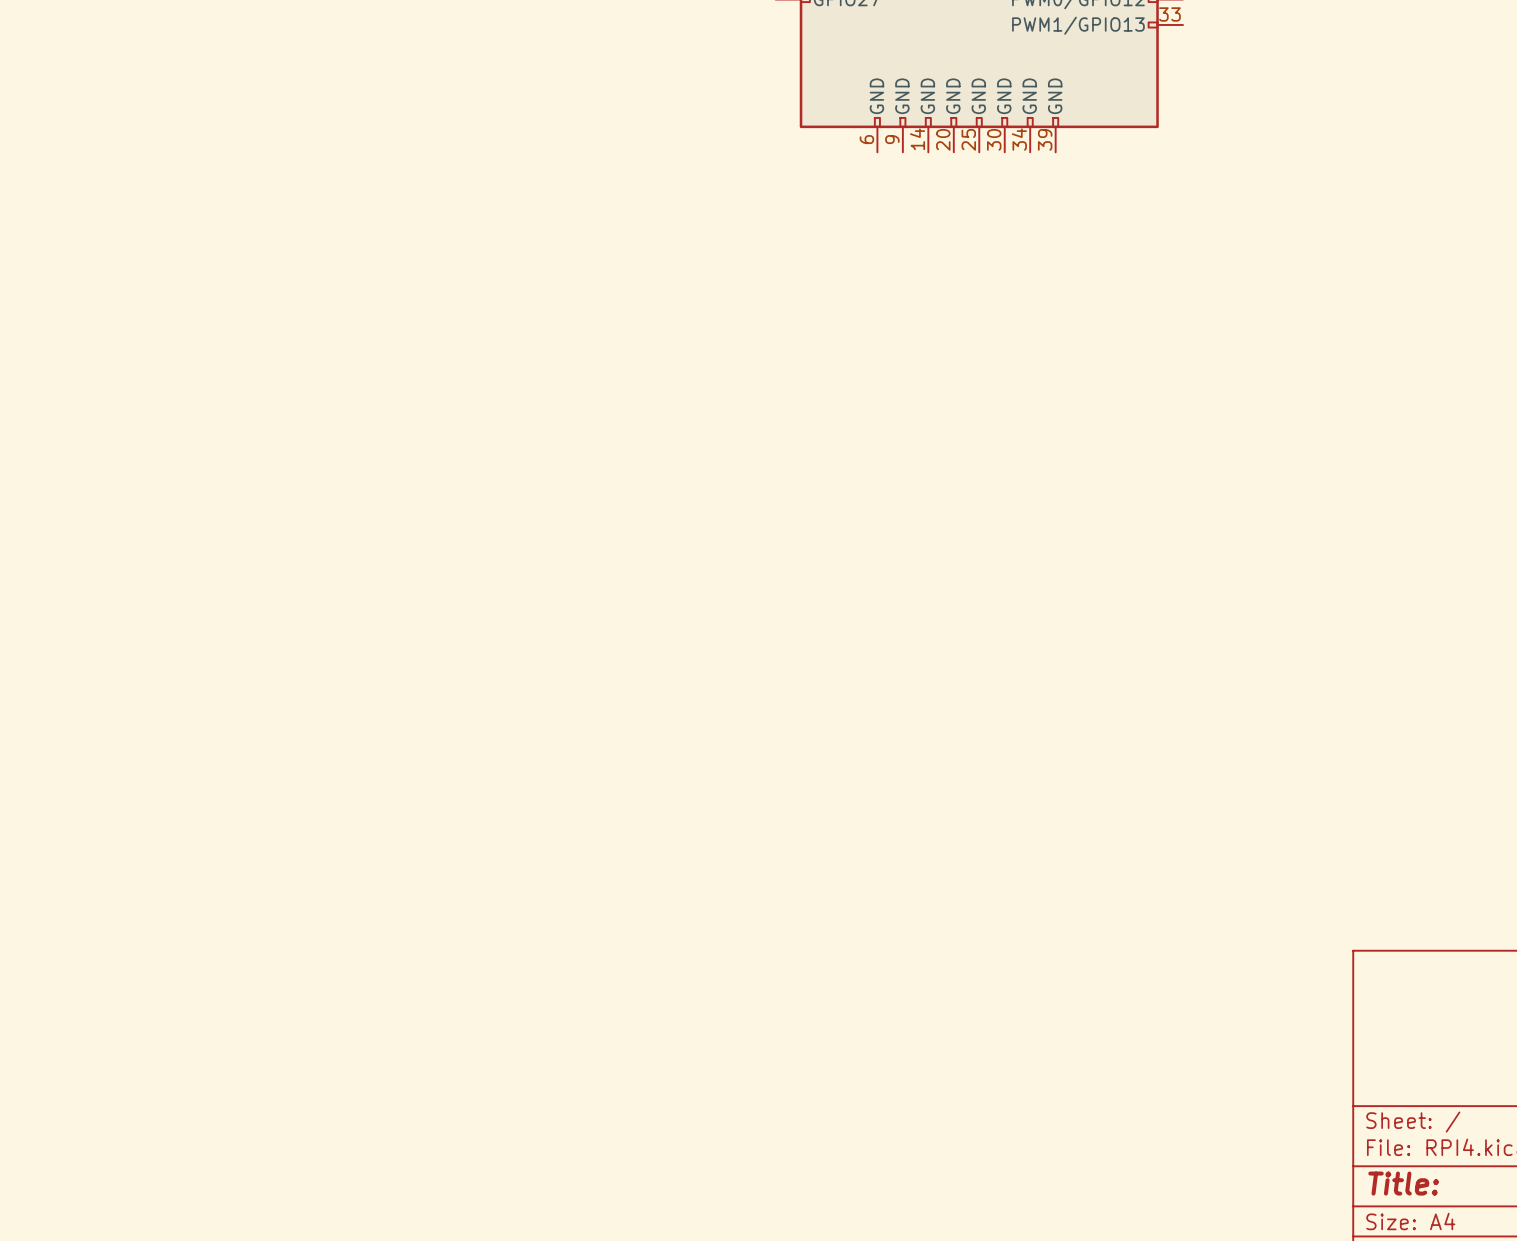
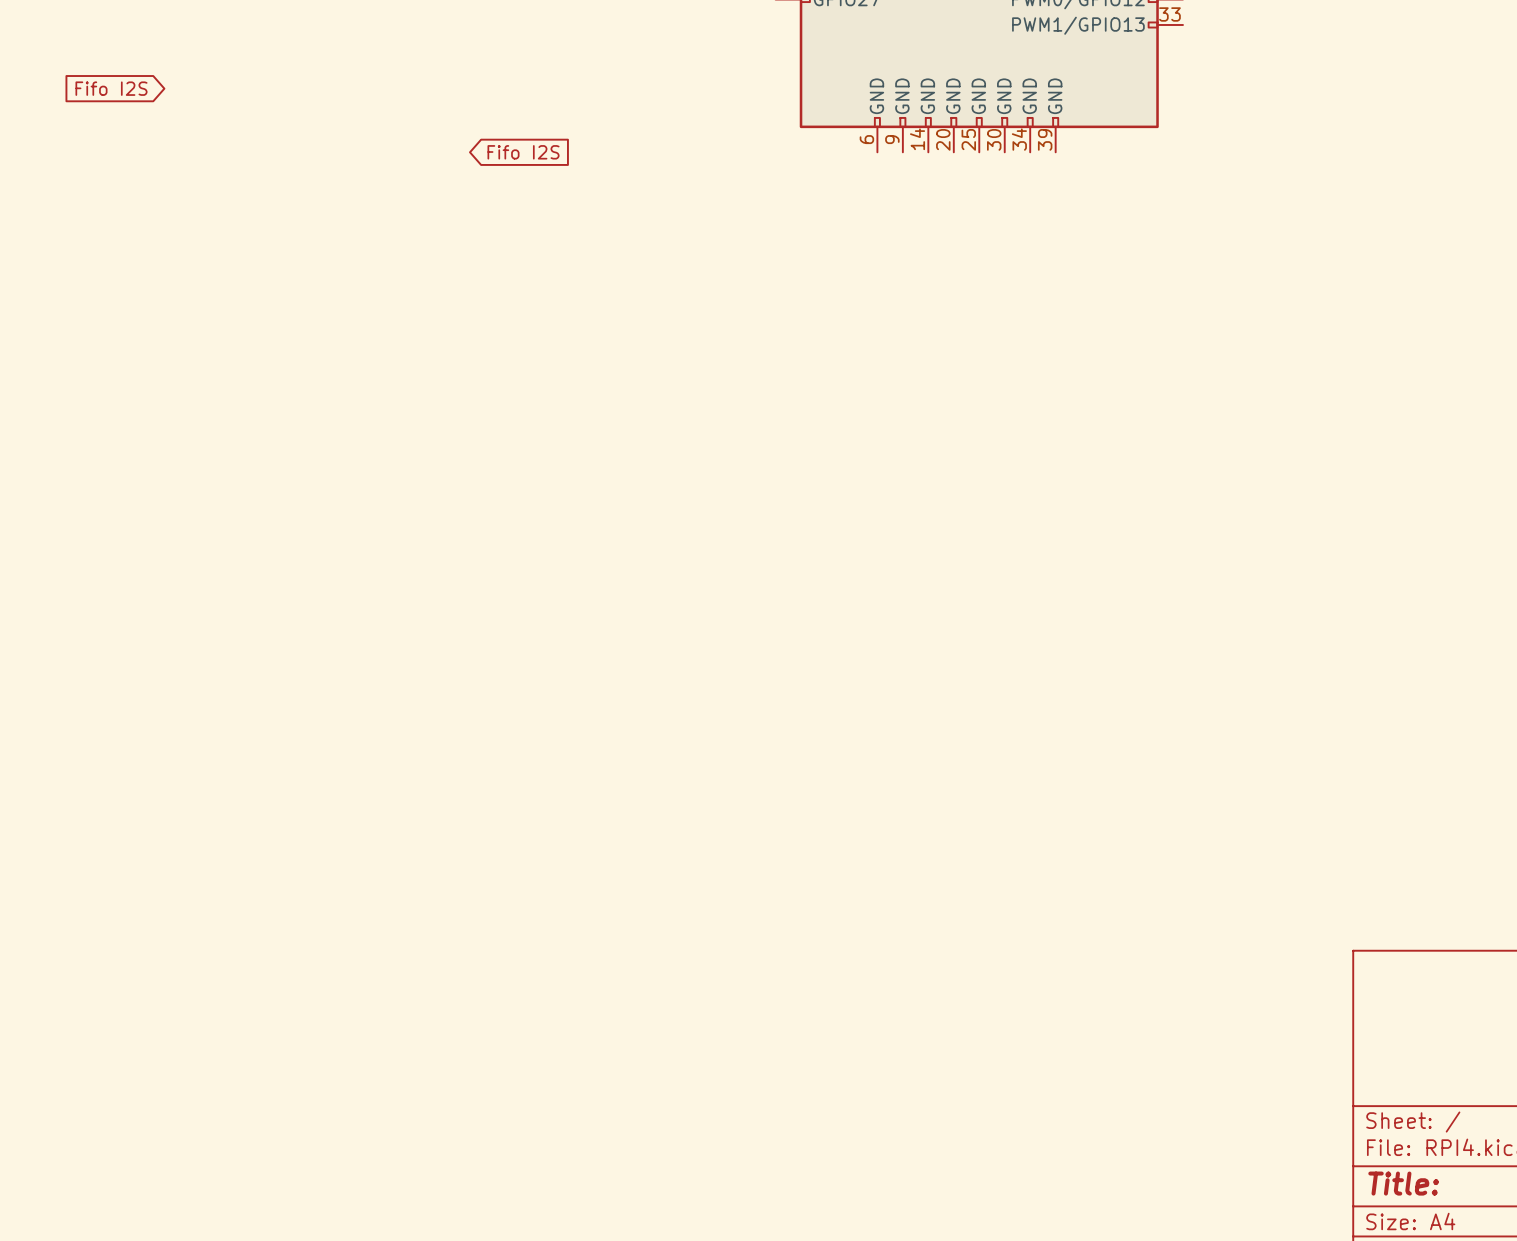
global label: none -> Fifo I2S (111, 88)
global label: none -> Fifo I2S (523, 152)

